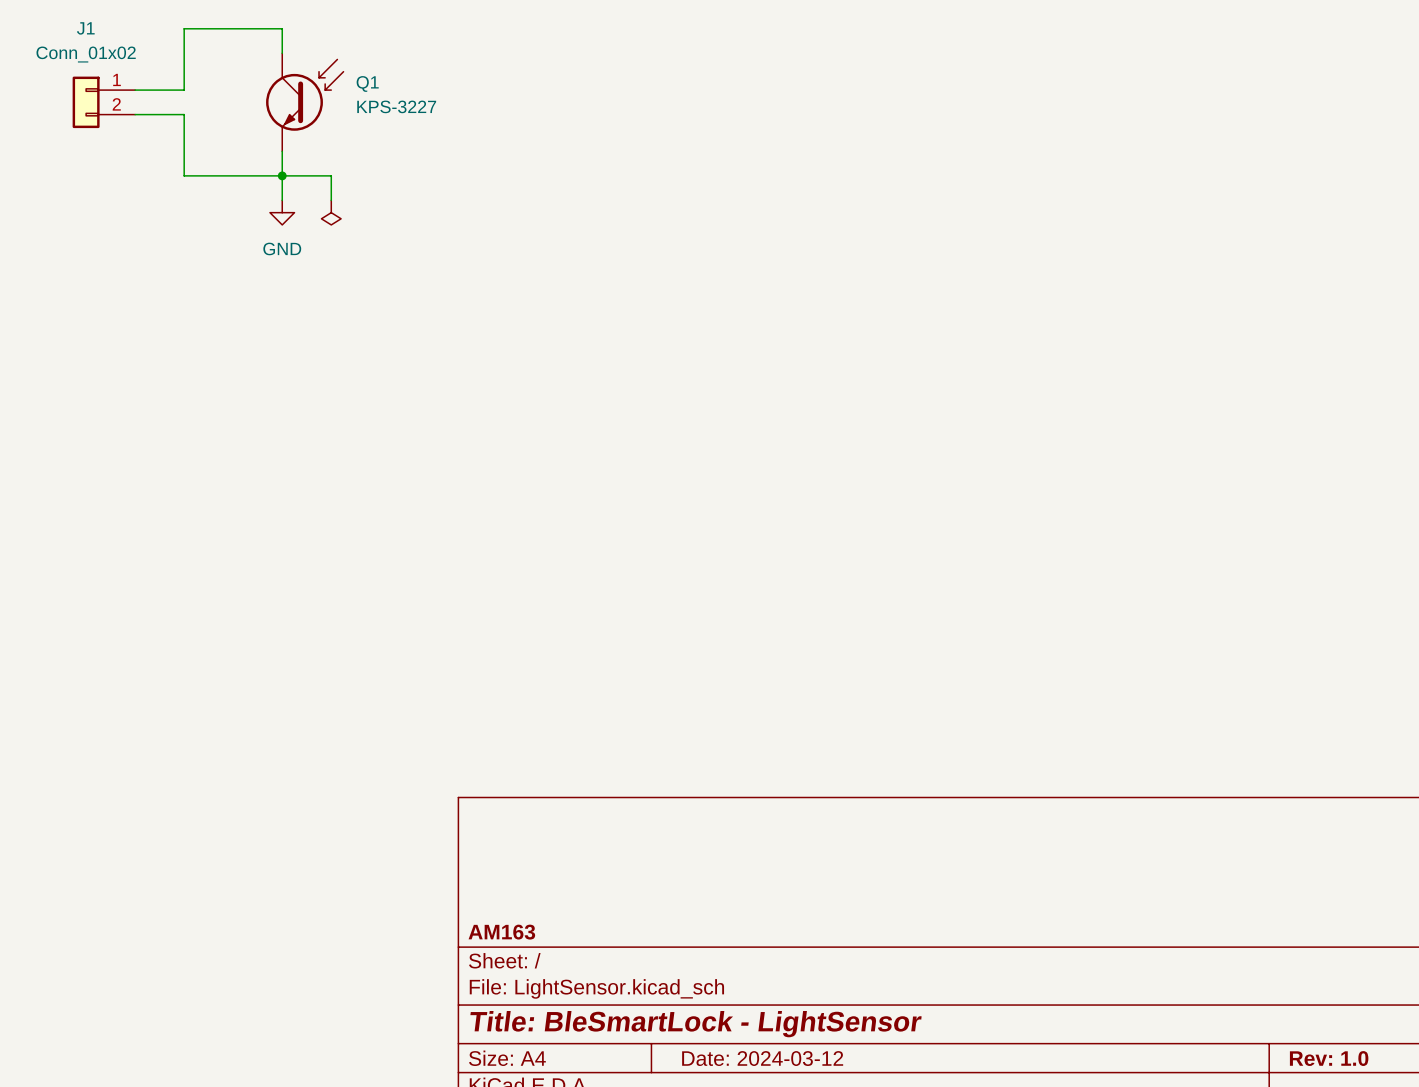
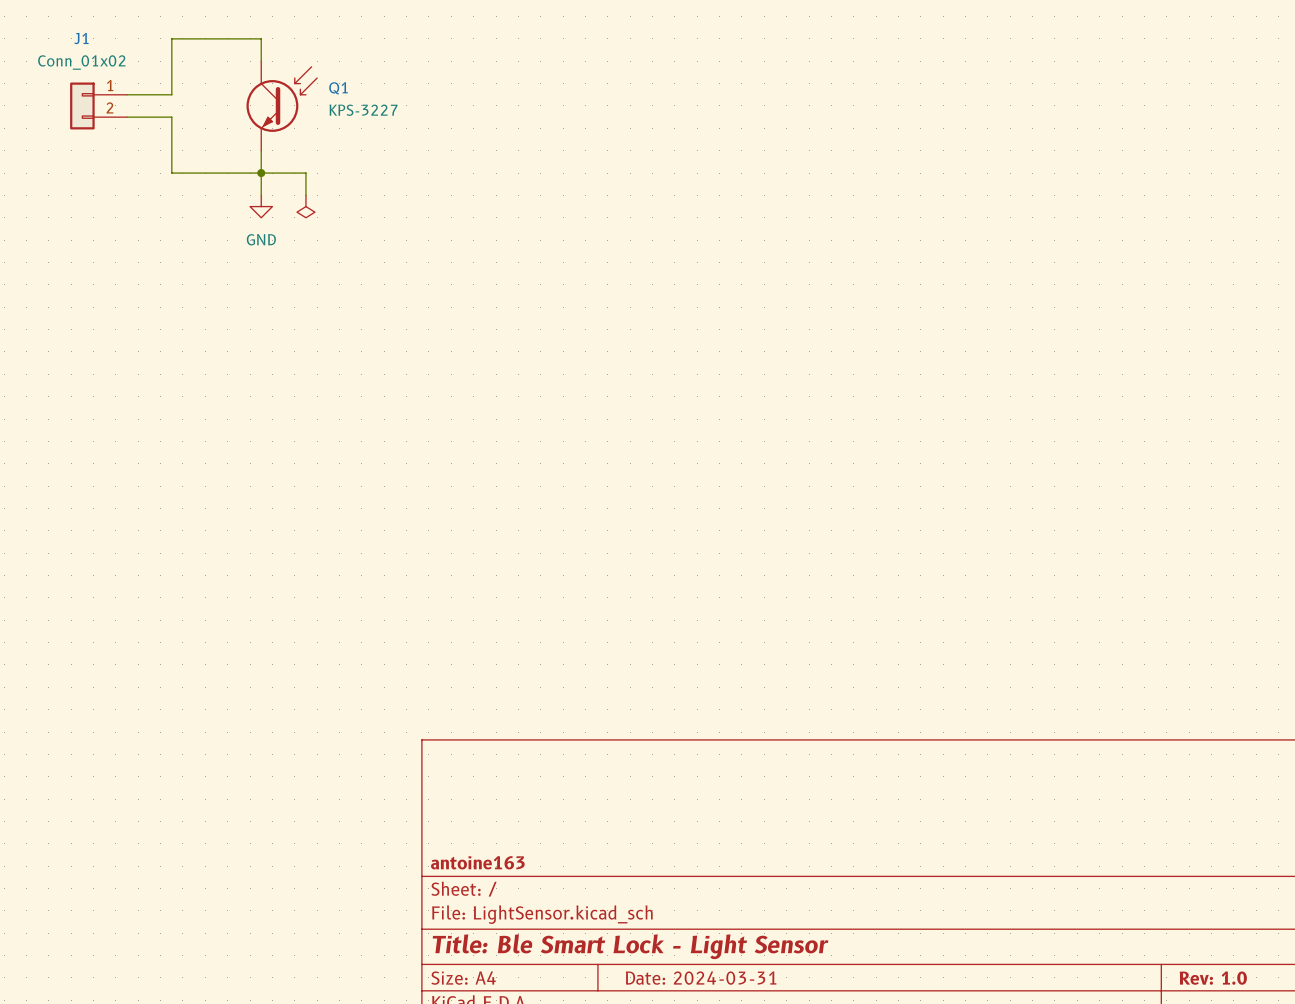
title block: AM163 (501, 932) -> antoine163 (477, 862)
title block: Title: BleSmartLock - LightSensor (696, 1024) -> Title: Ble Smart Lock - Light Sensor (630, 946)
title block: Date: 2024-03-12 (762, 1058) -> Date: 2024-03-31 (701, 978)

